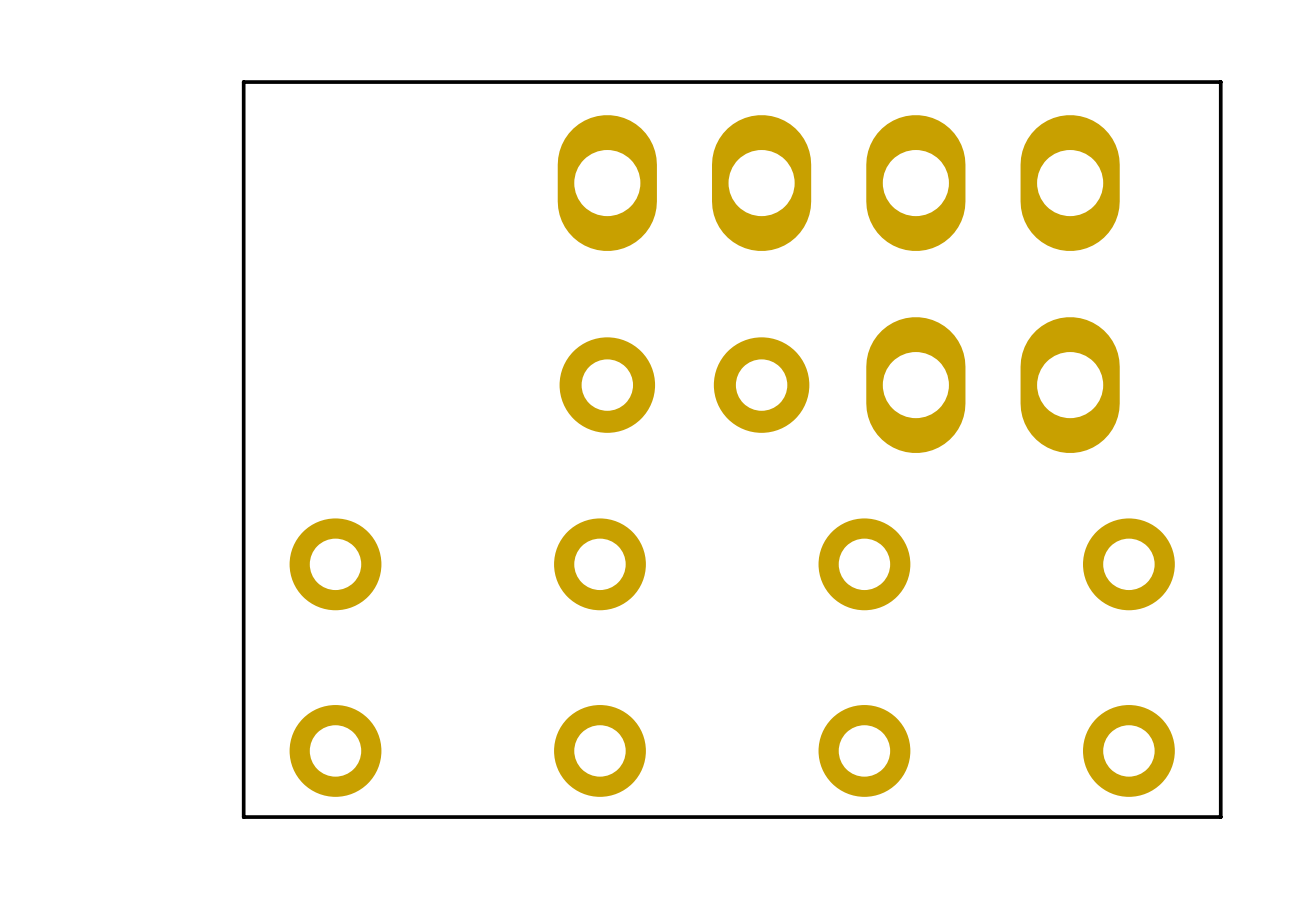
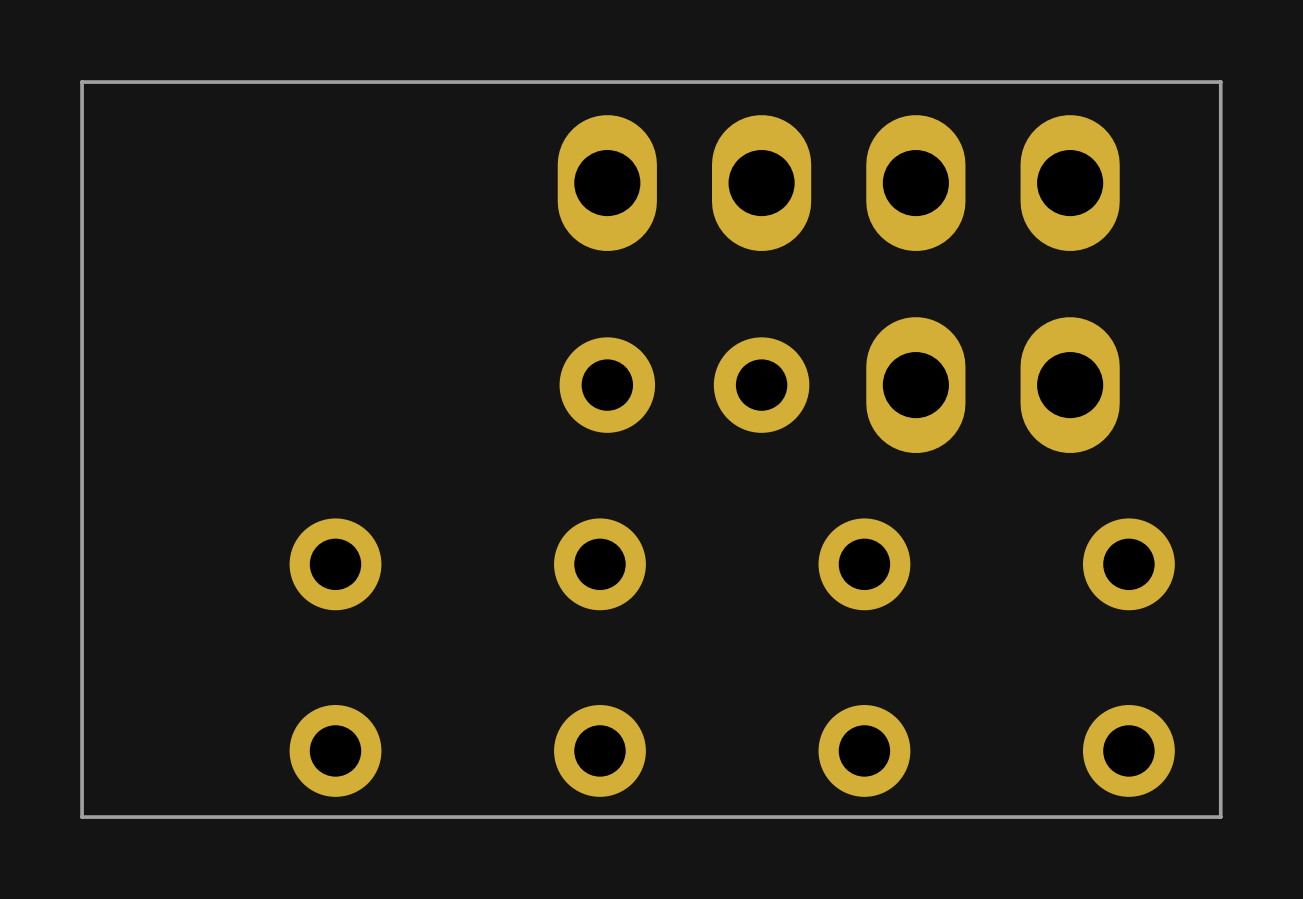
board edge: (243, 82) (243, 817) -> (243, 82) (82, 82) (82, 817) (243, 817)

